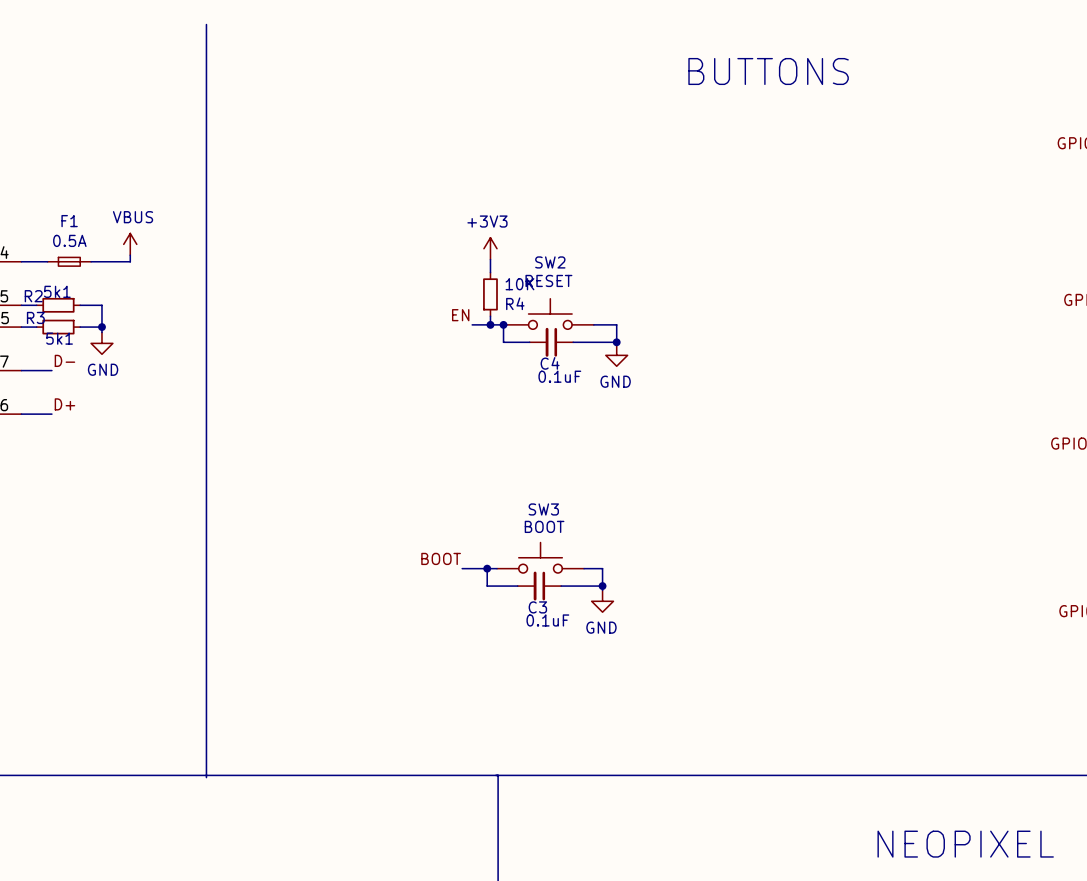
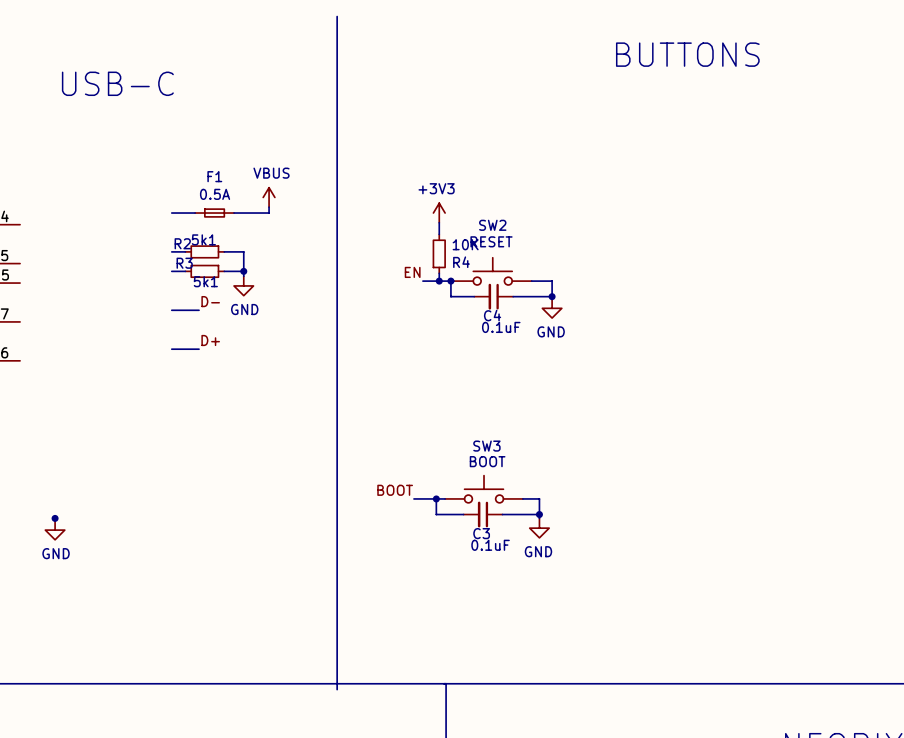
line: (206, 24) (206, 777) -> (337, 16) (337, 689)
text: none -> USB-C (117, 83)
power symbol position: VBUS (130, 244) -> VBUS (269, 197)
wire: (130, 255) (130, 261) (91, 261) -> (269, 207) (269, 213) (234, 213)
wire: (21, 261) (47, 261) -> (171, 213) (195, 213)
F1 position: (69, 261) -> (214, 213)
wire: (21, 305) (36, 305) -> (171, 251) (185, 251)
R2 position: (58, 305) -> (204, 251)
wire: (80, 305) (101, 305) (101, 332) -> (224, 251) (243, 251) (243, 276)
junction: none -> (243, 271)
wire: (21, 327) (36, 327) -> (171, 271) (185, 271)
R3 position: (58, 327) -> (204, 271)
wire: (80, 327) (101, 327) -> (224, 271) (243, 271)
junction: (101, 327) -> none
power symbol: none -> GND (243, 285)
power symbol: GND (101, 343) -> none
label position: D- (64, 360) -> D- (210, 301)
wire: (21, 370) (51, 370) -> (171, 310) (199, 310)
label position: D+ (64, 404) -> D+ (210, 340)
wire: (21, 414) (51, 414) -> (171, 349) (199, 349)
junction: none -> (55, 518)
power symbol: none -> GND (55, 530)

